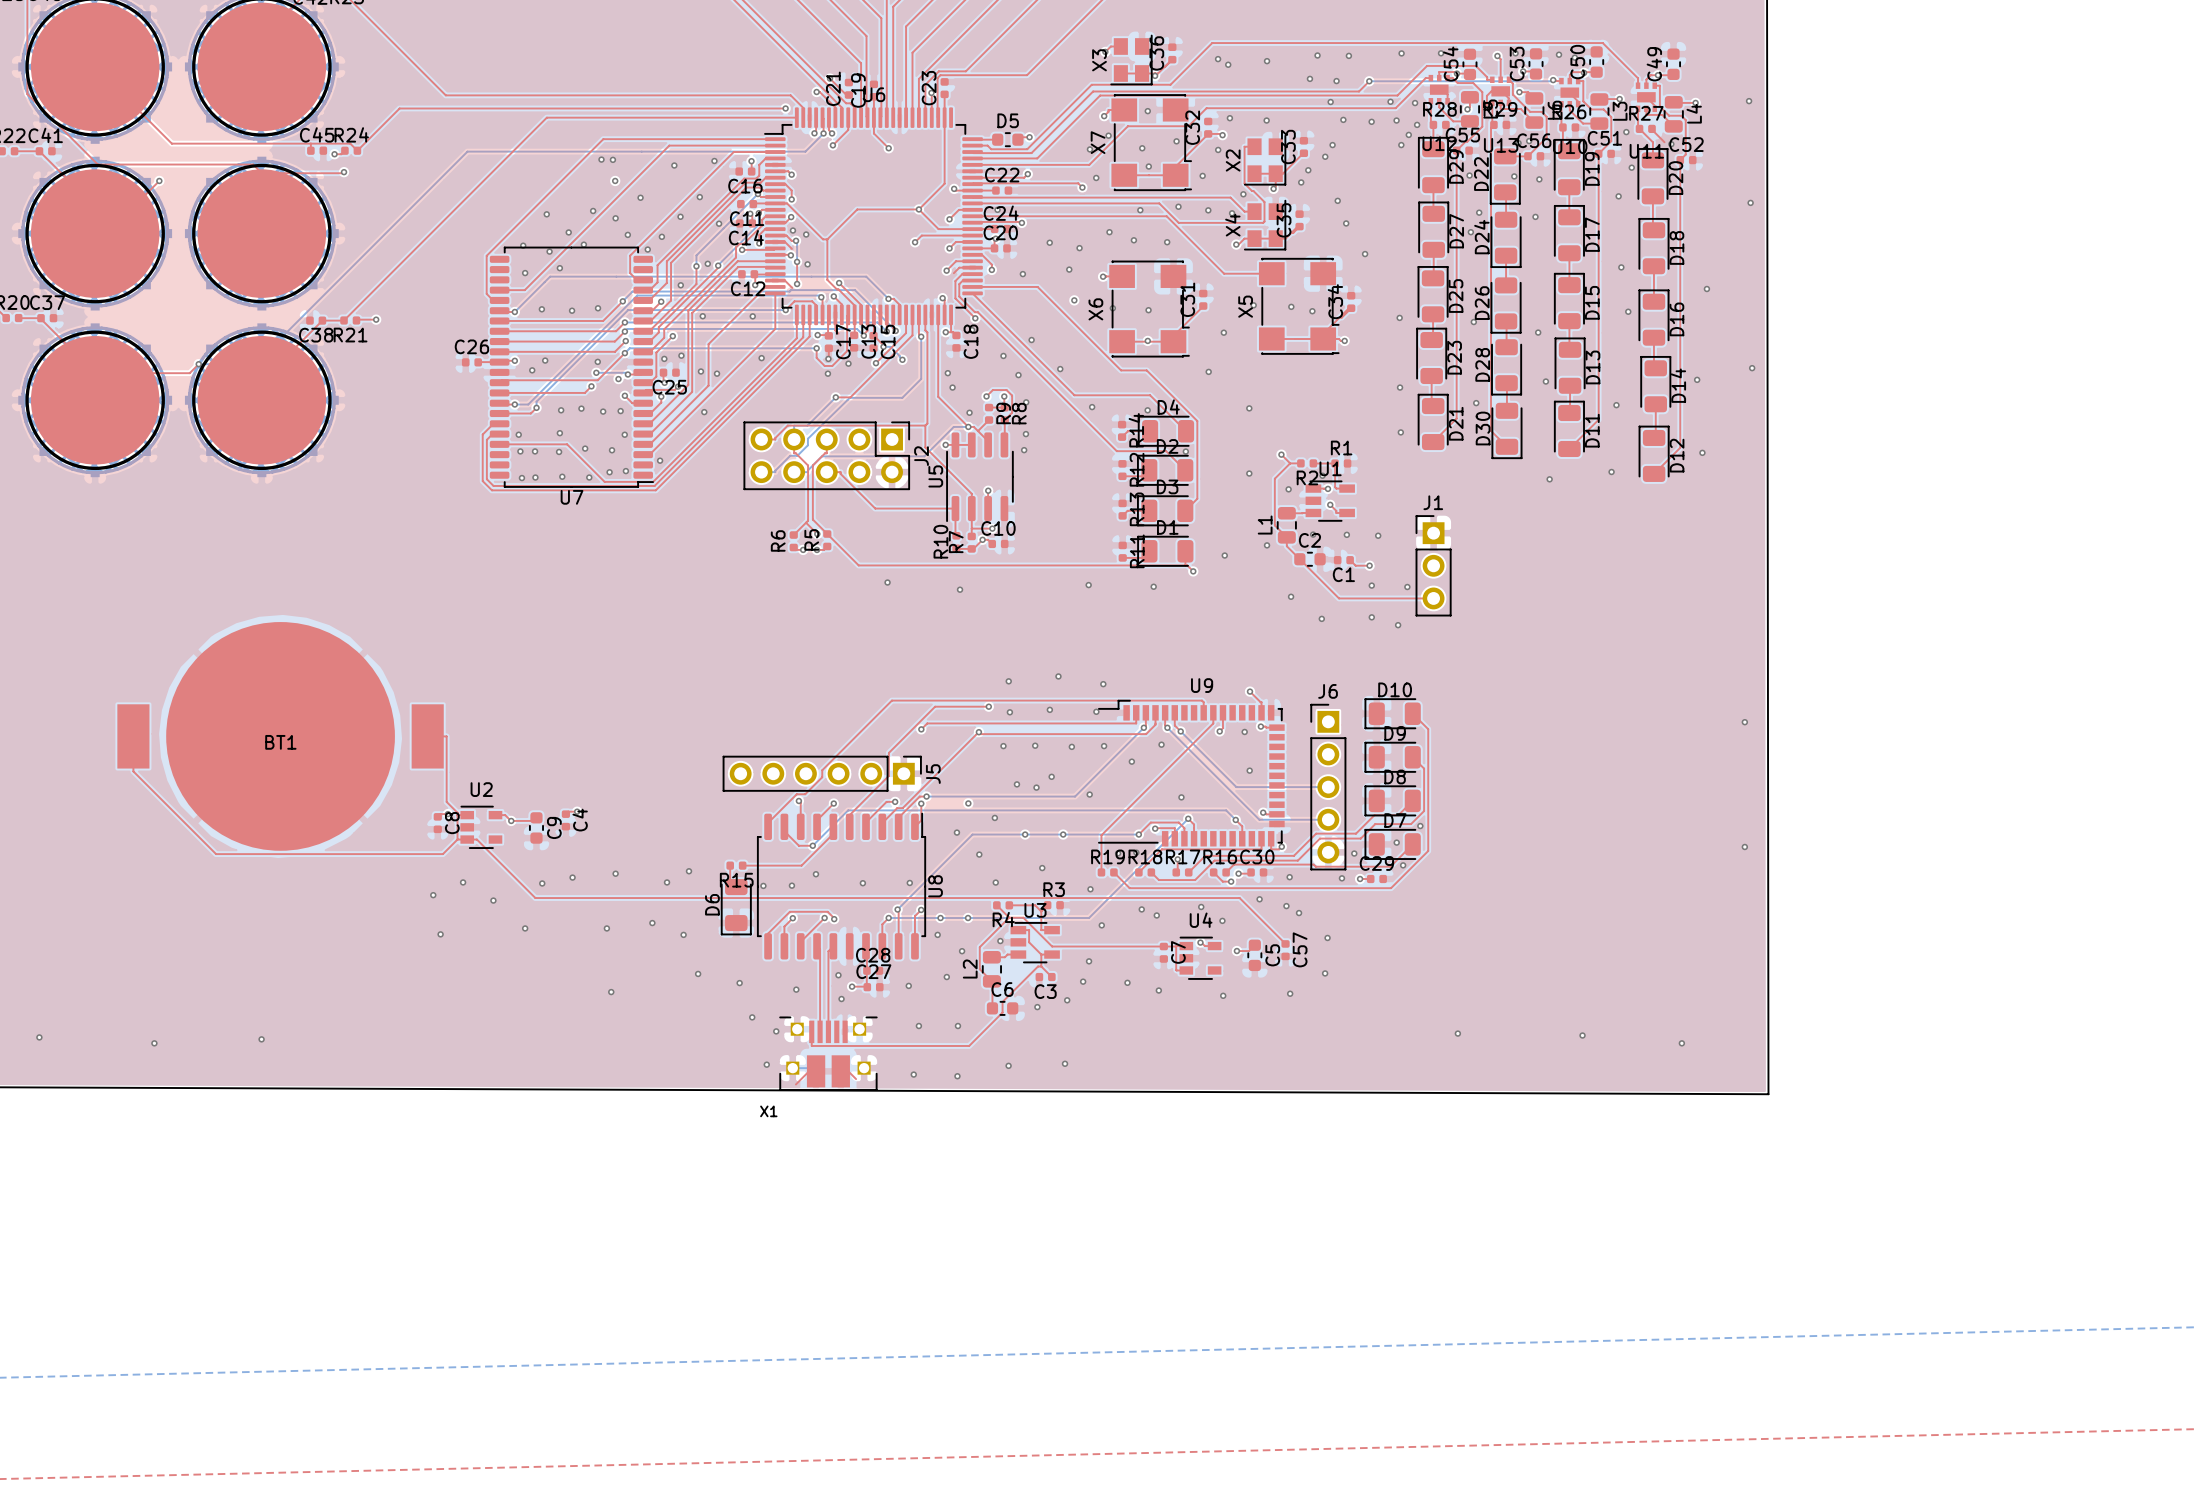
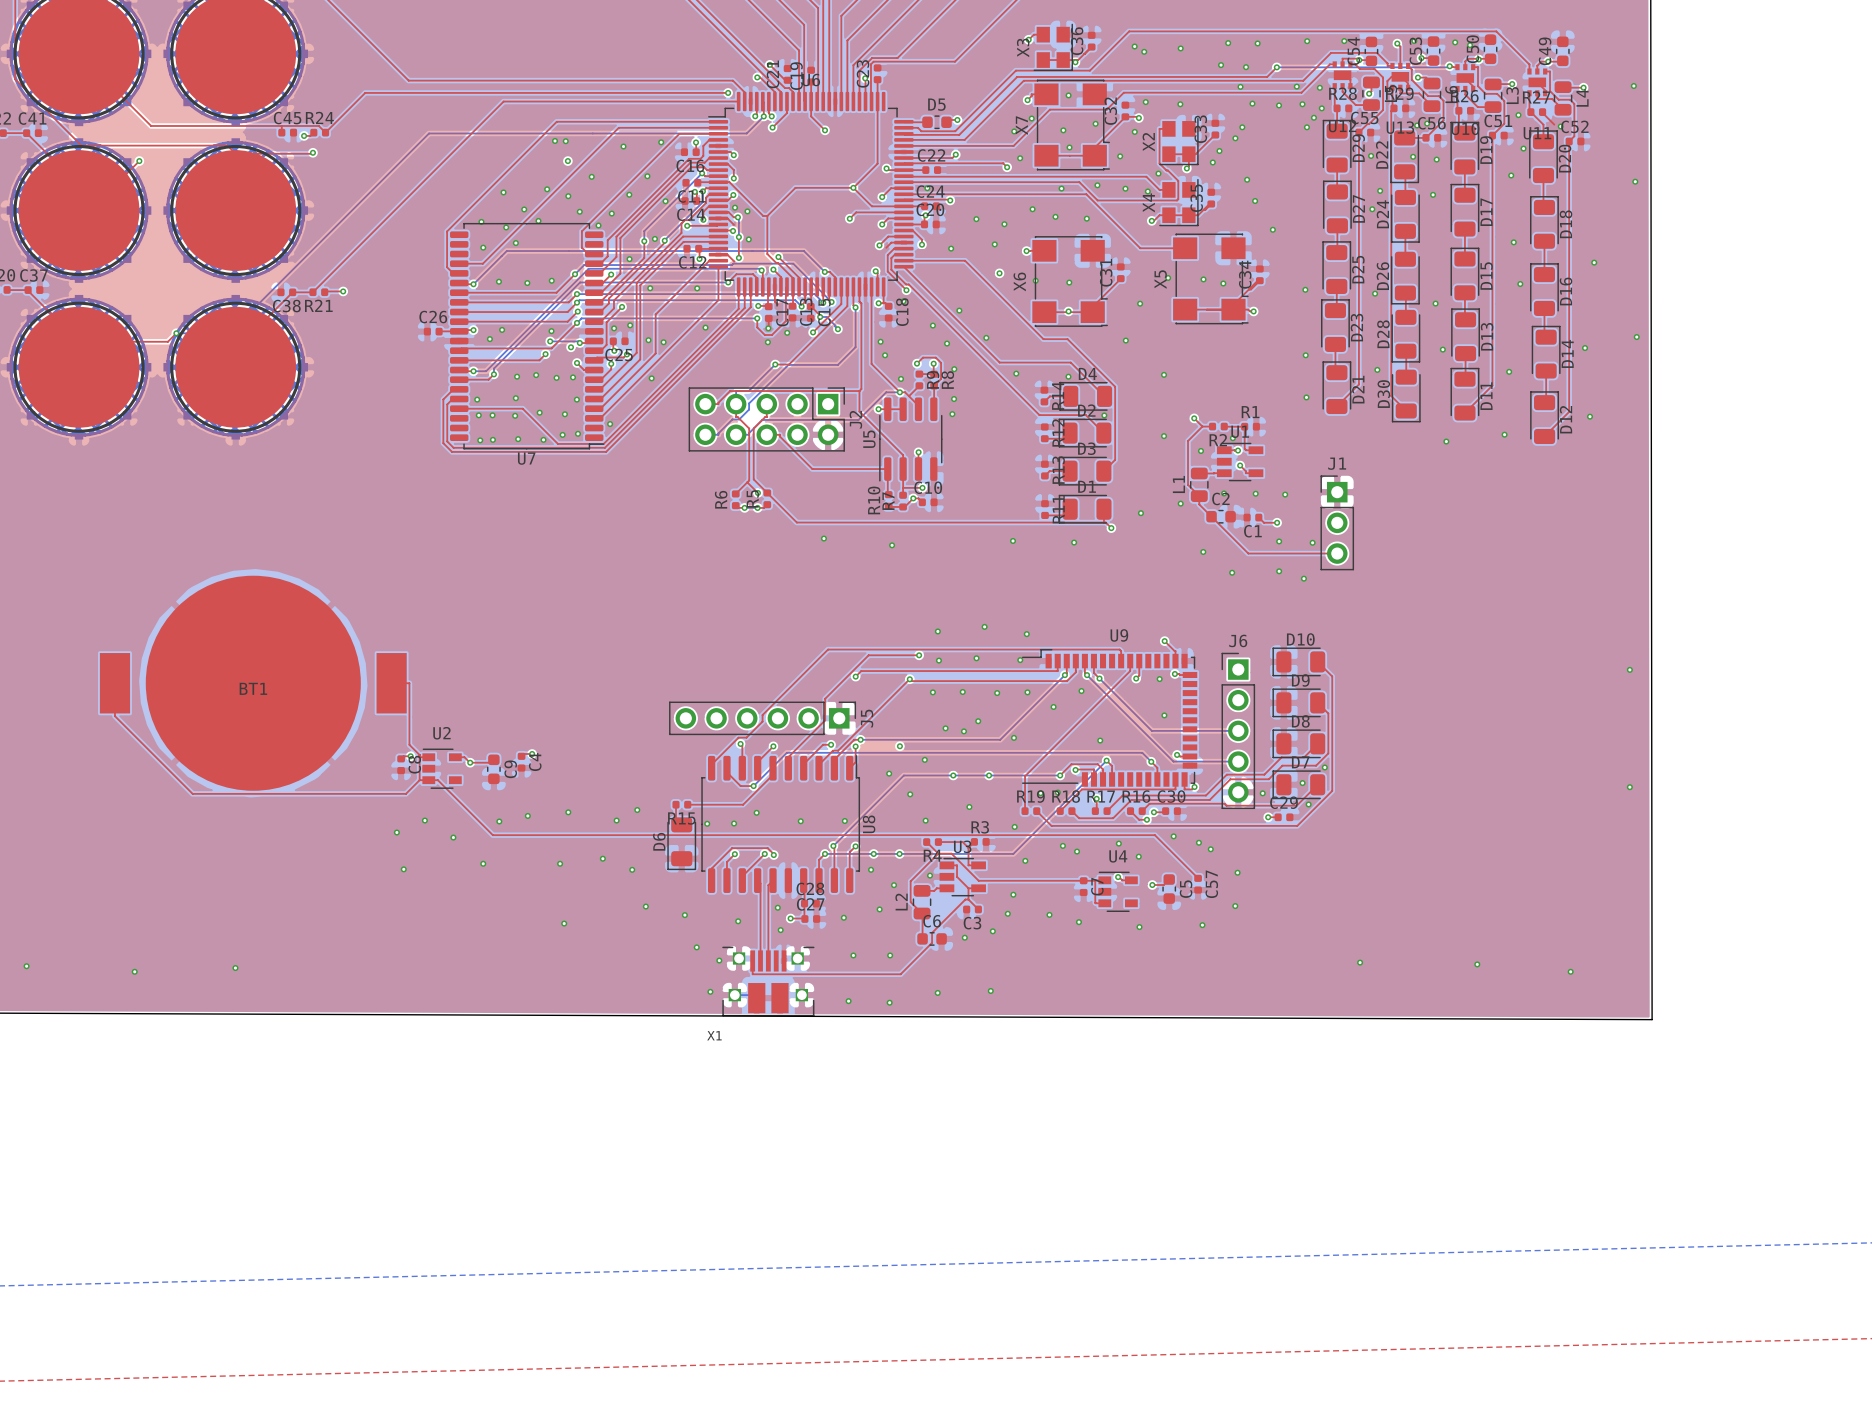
via: (1289, 877) -> none
via: (1341, 878) -> none
top track: (816, 1071) (809, 1071) (795, 1084) -> none
top track: (840, 1071) (848, 1071) (856, 1079) -> none

